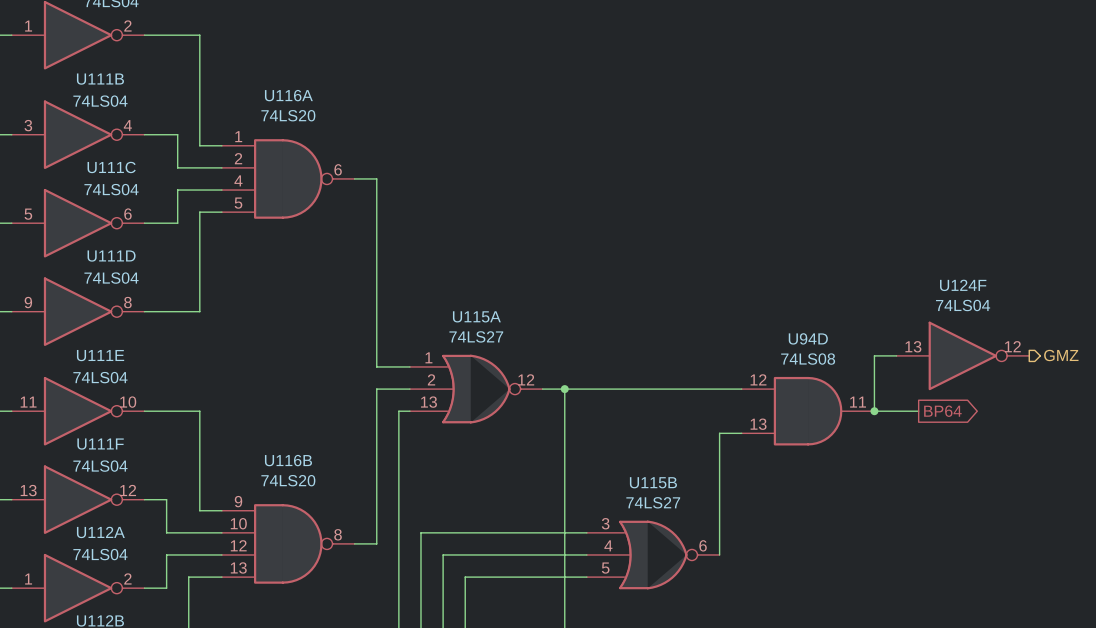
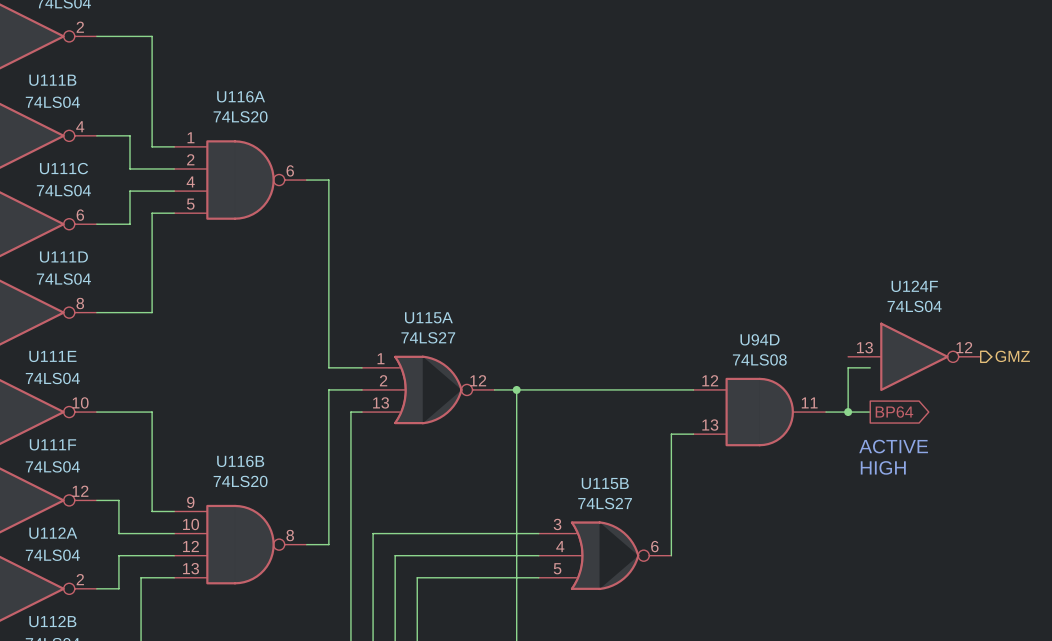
wire: (896, 355) (874, 355) (874, 411) -> none
wire: none -> (870, 367) (848, 367) (848, 412)
junction position: (874, 411) -> (848, 412)
text: none -> ACTIVE (893, 446)
text: none -> HIGH (883, 467)

